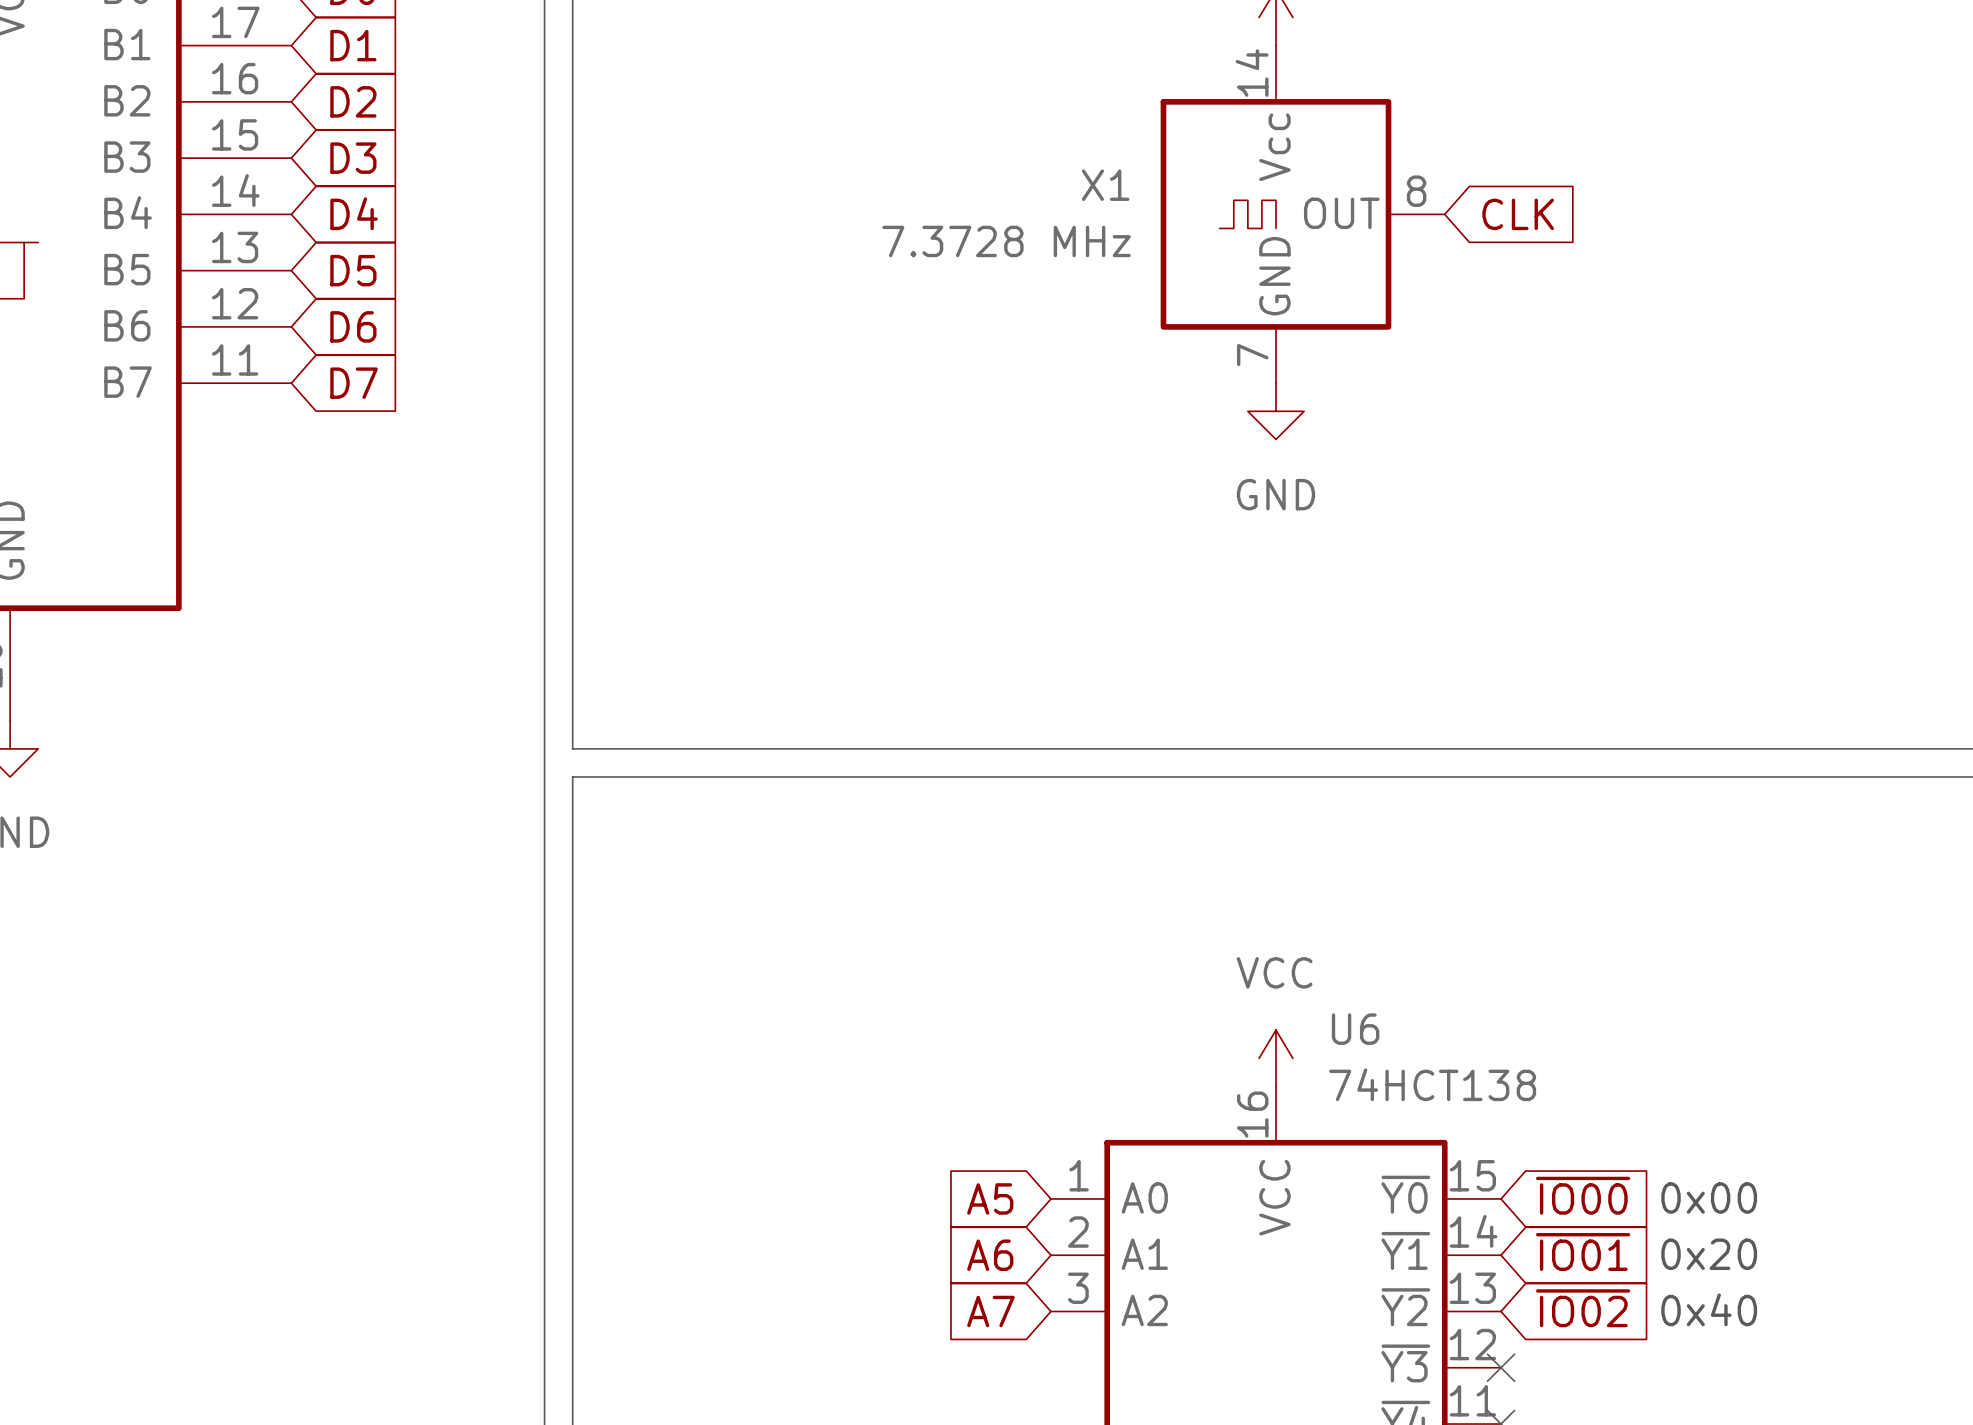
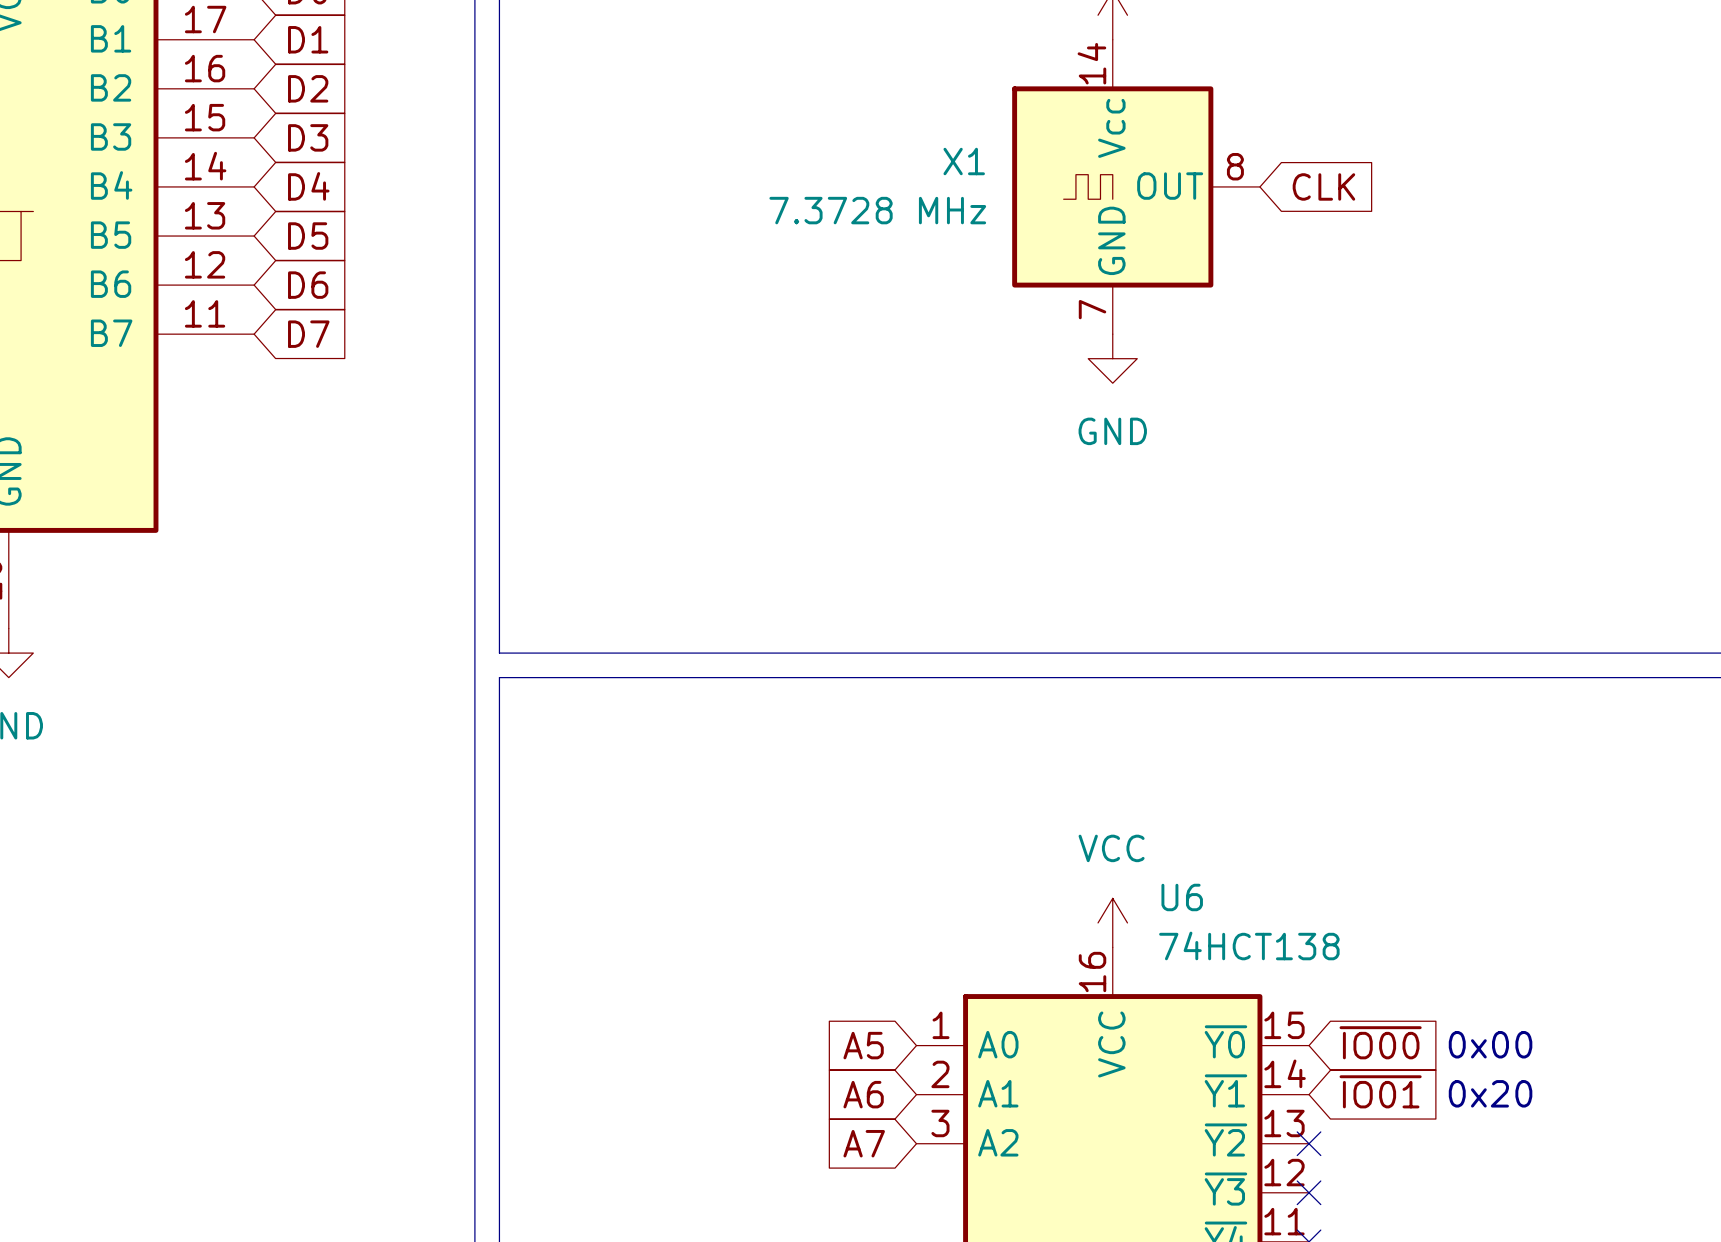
global label: ~{IO02} (1583, 1308) -> none
text: 0x40 (1709, 1309) -> none
no-connect mark: none -> (1309, 1143)

